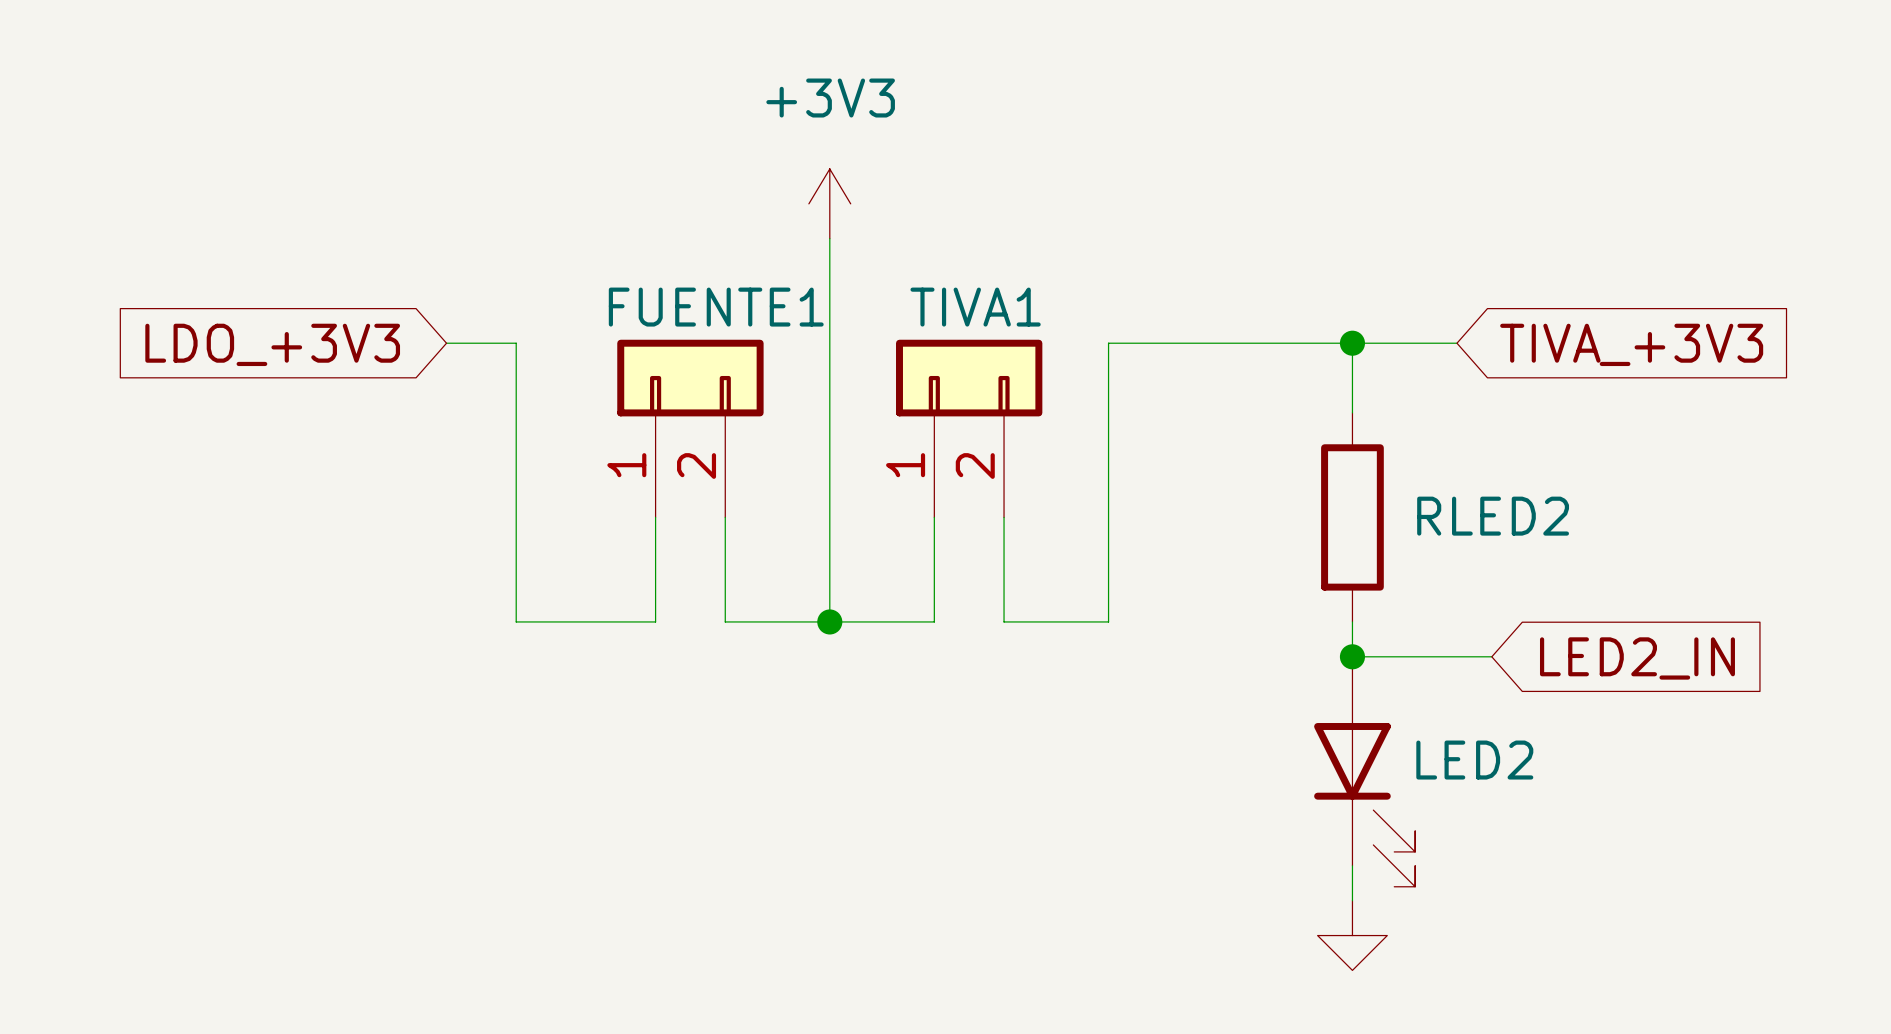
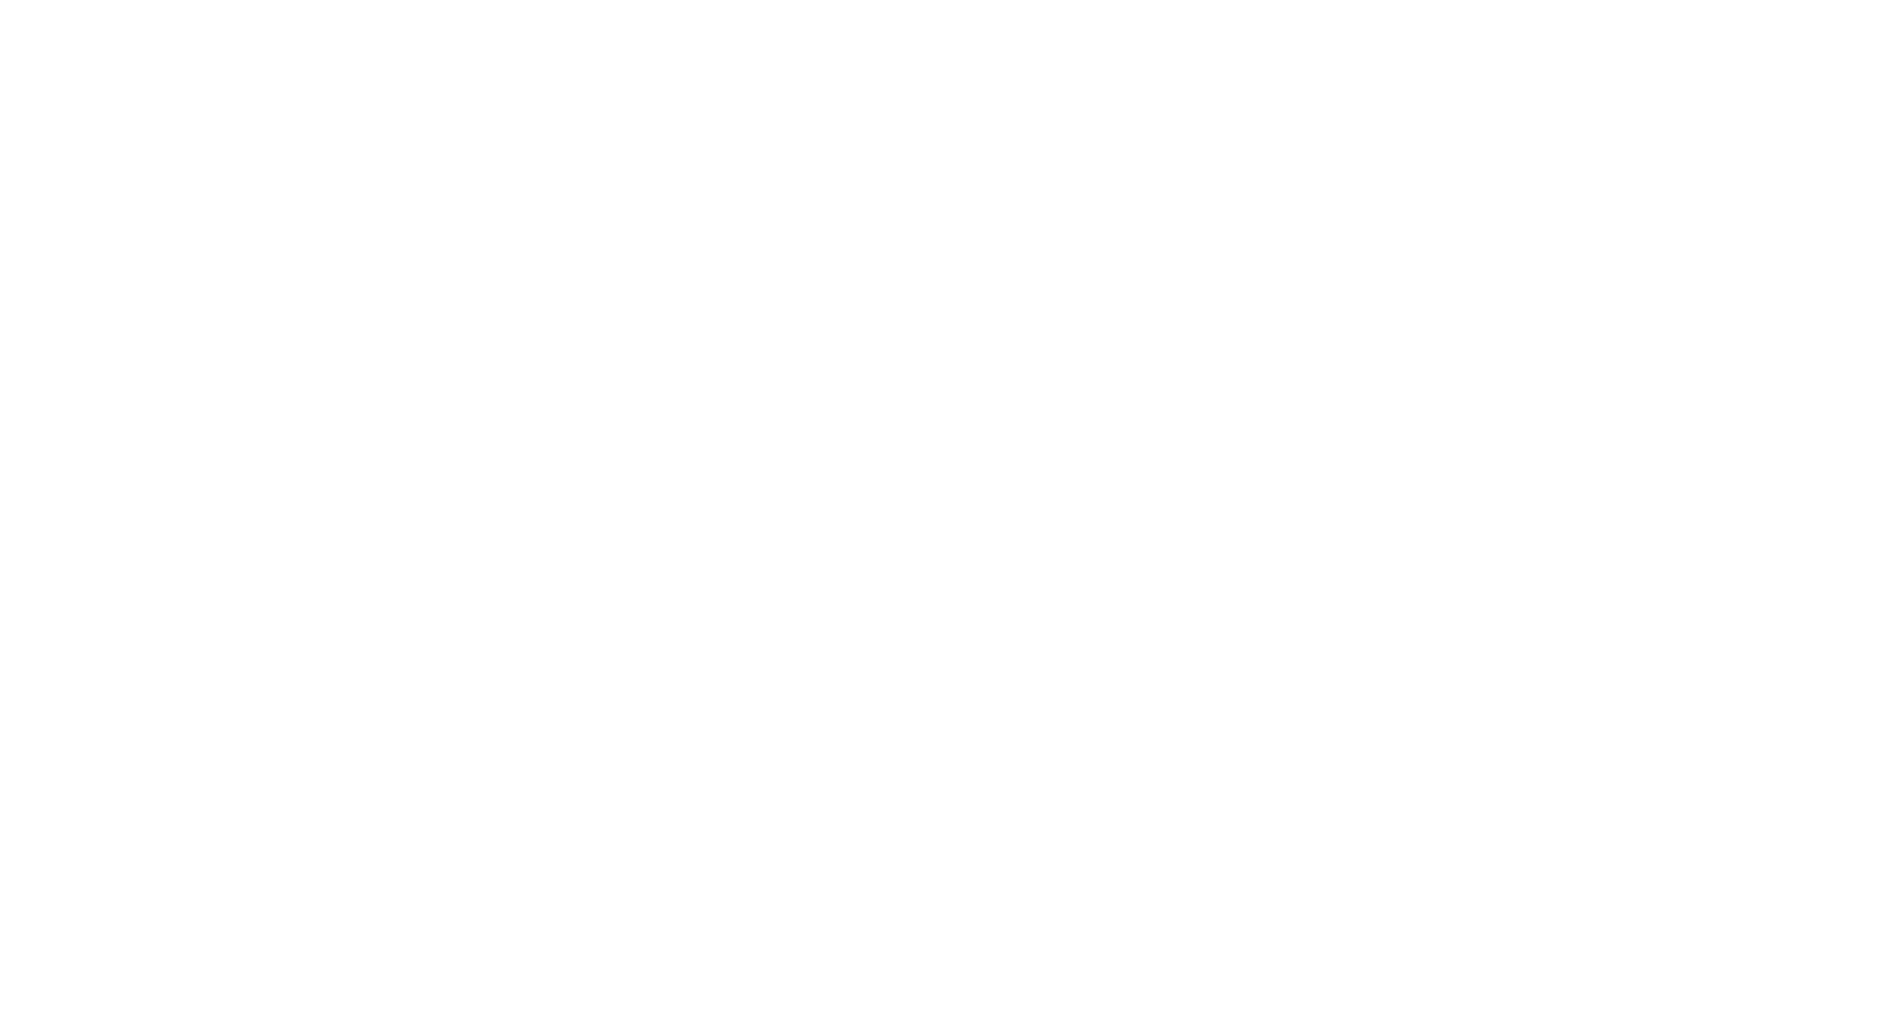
power symbol: +3V3 (829, 203) -> none
wire: (829, 238) (829, 621) -> none
wire: (446, 343) (516, 343) (516, 621) (655, 621) (655, 517) -> none
wire: (1352, 343) (1352, 412) -> none
junction: (1352, 343) -> none
wire: (1456, 343) (1108, 343) (1108, 621) (1004, 621) (1004, 517) -> none
global label: LDO_+3V3 (272, 344) -> none
global label: TIVA_+3V3 (1631, 344) -> none
FUENTE1: (690, 428) -> none
TIVA1: (969, 428) -> none
wire: (725, 517) (725, 621) (934, 621) (934, 517) -> none
RLED2: (1352, 517) -> none
junction: (829, 621) -> none
wire: (1352, 621) (1352, 656) (1491, 656) -> none
junction: (1352, 656) -> none
global label: LED2_IN (1637, 658) -> none
LED2: (1364, 771) -> none
wire: (1352, 865) (1352, 900) -> none
power symbol: (1352, 935) -> none

